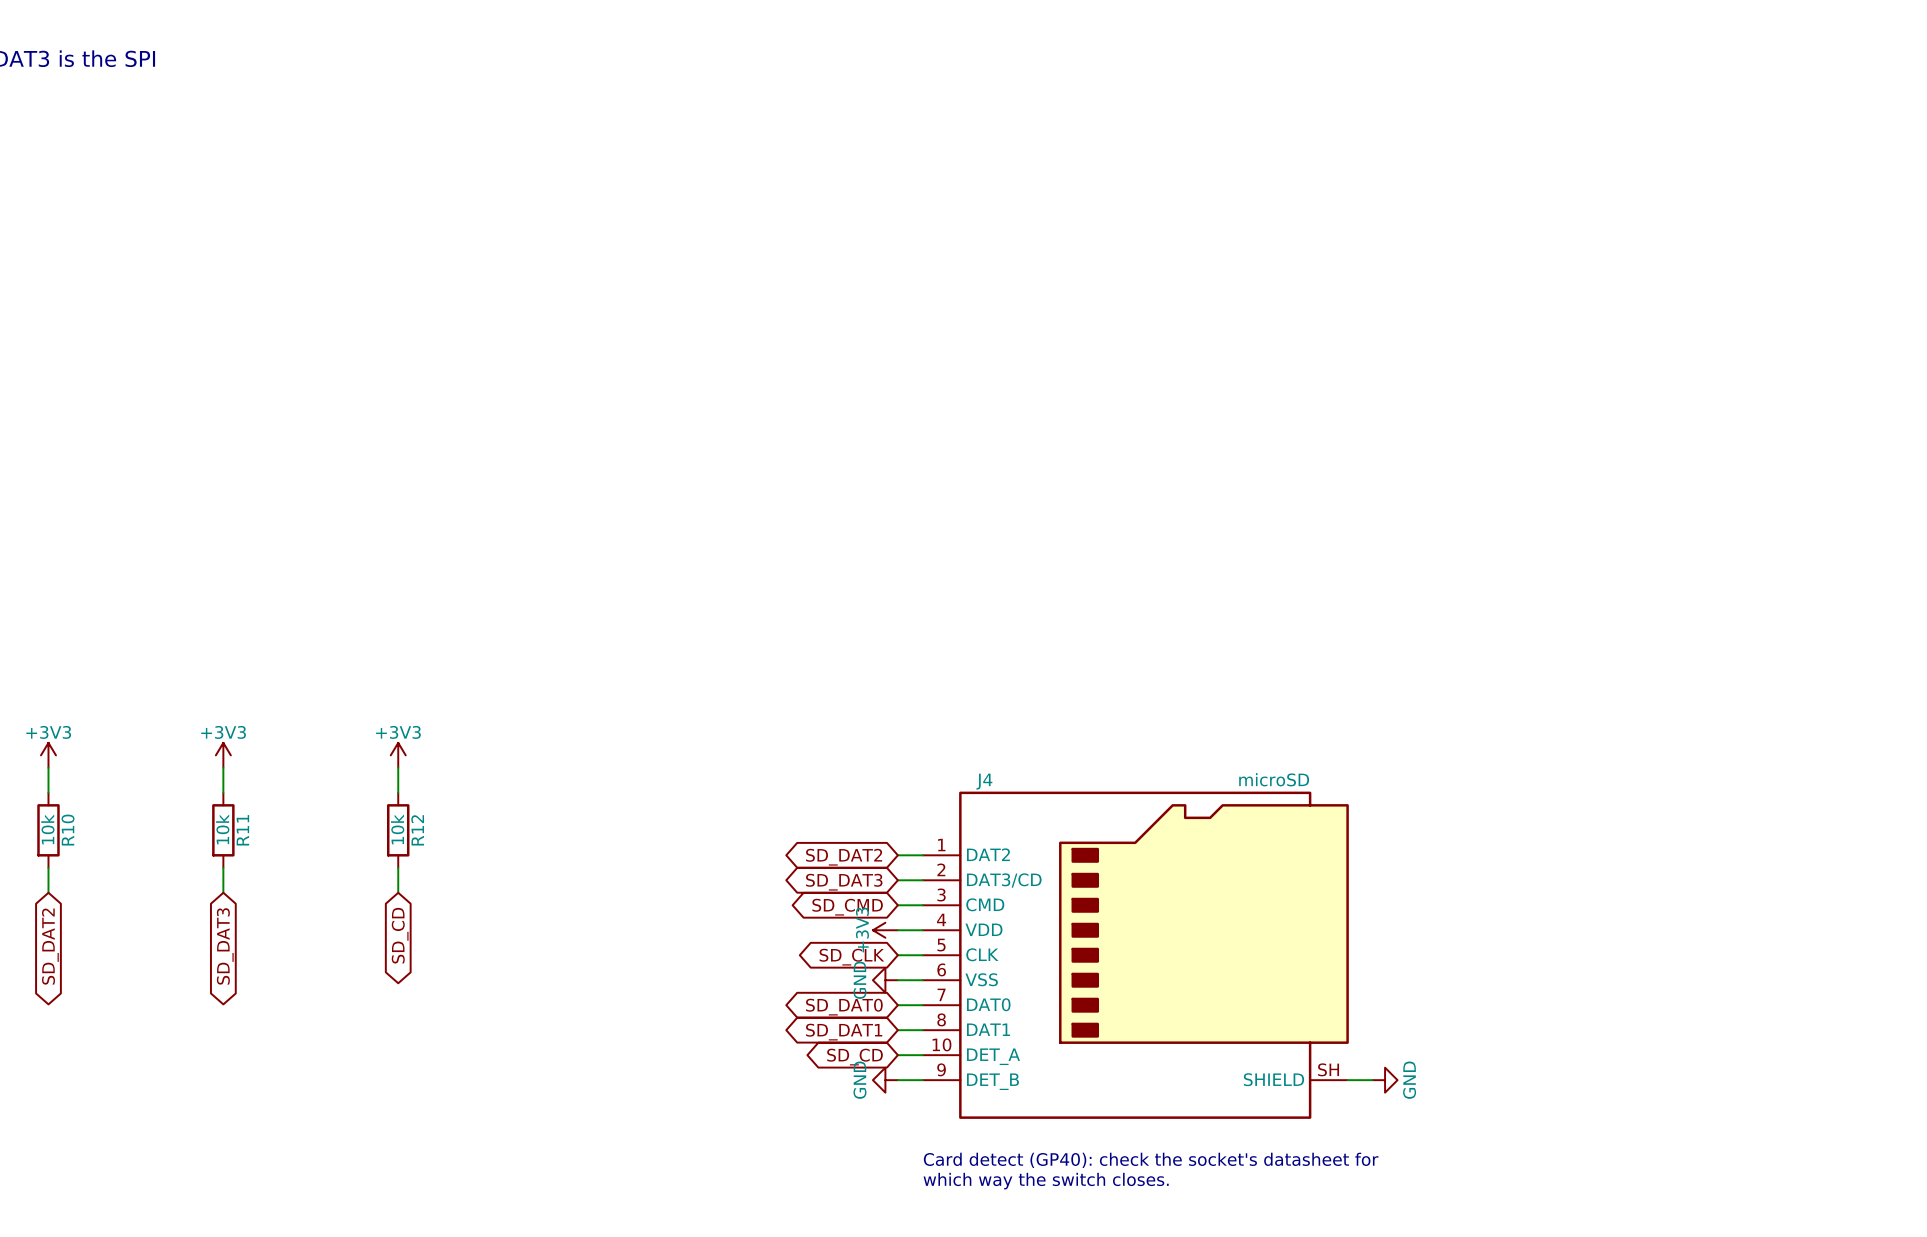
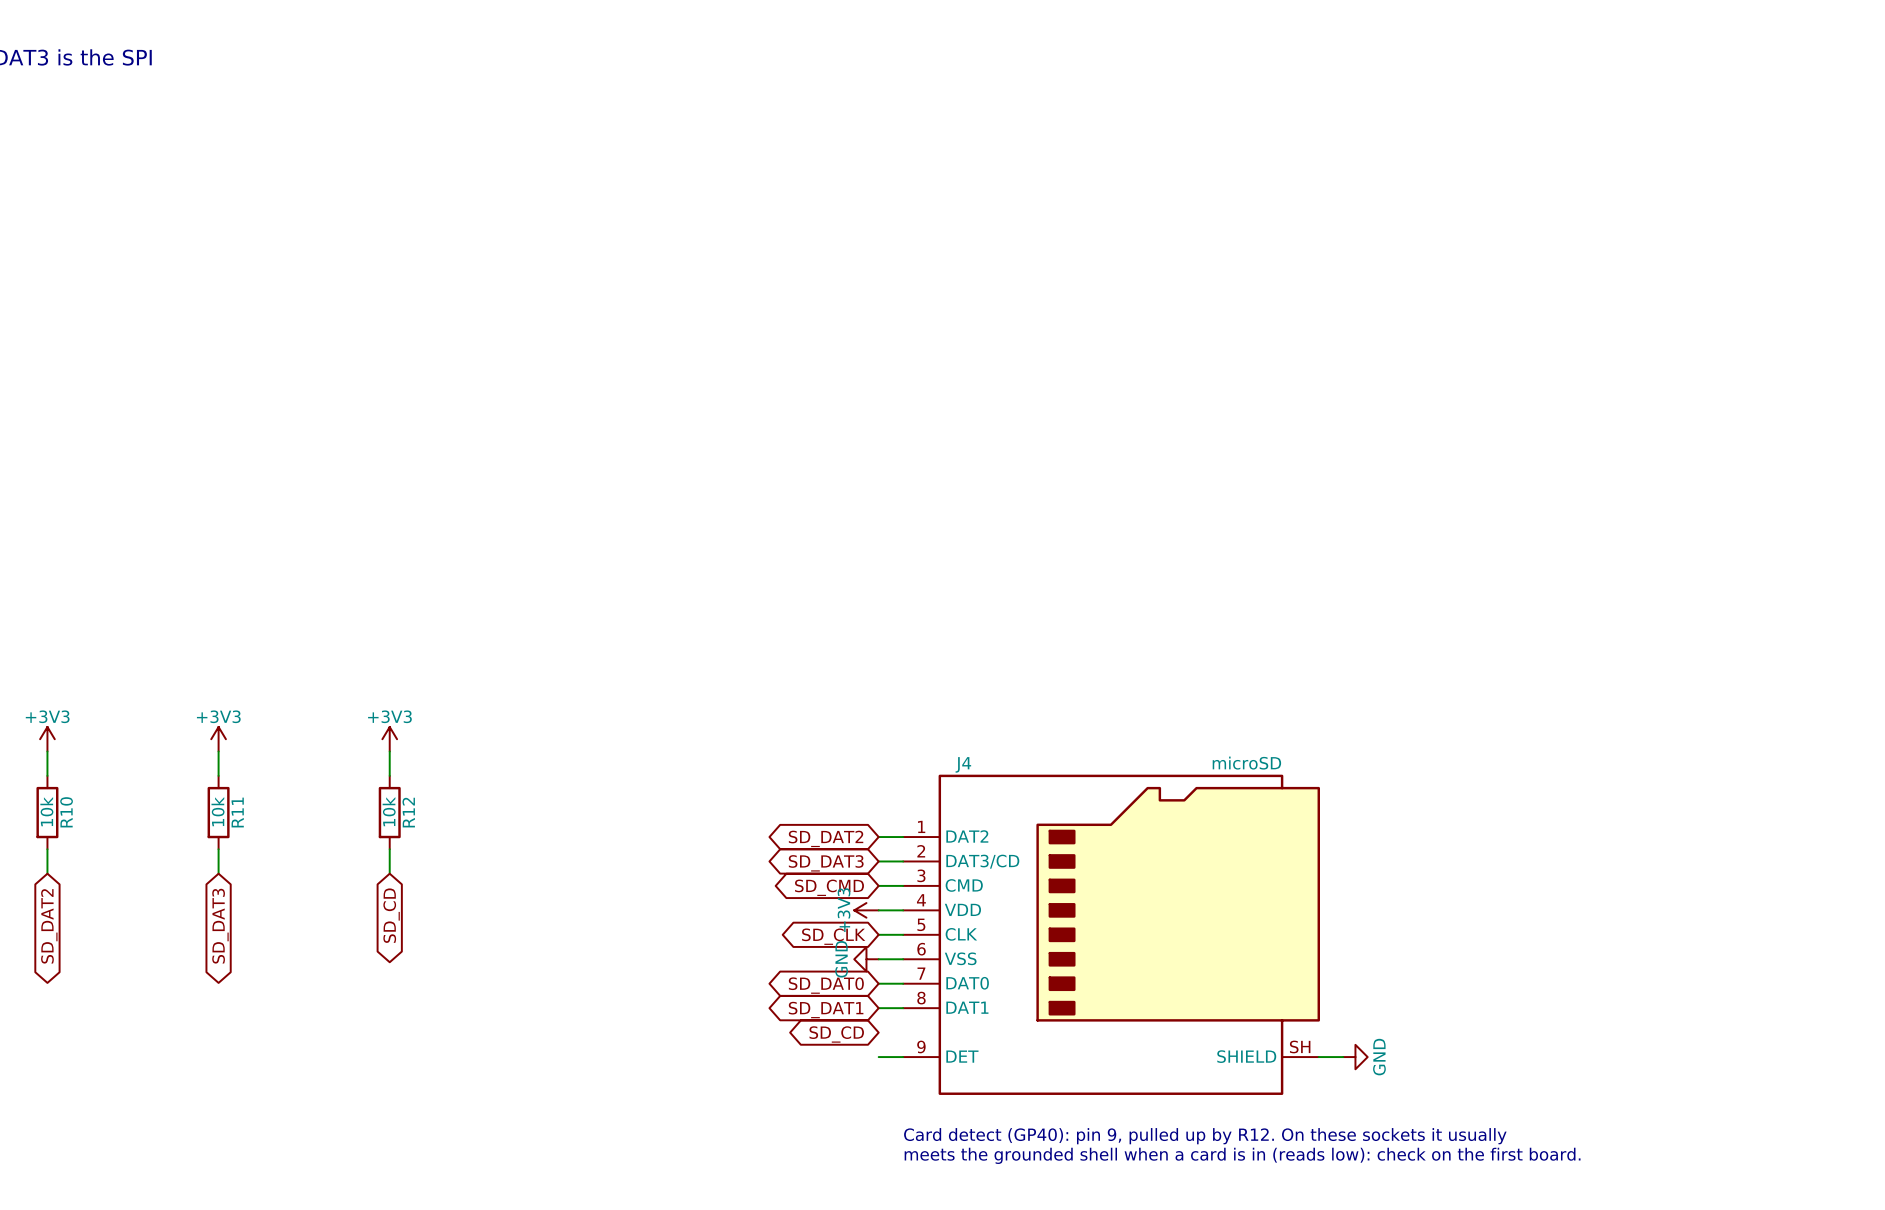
J4 symbol: [922, 791, 1349, 1119] -> [903, 774, 1320, 1095]
wire: (897, 1055) (922, 1055) -> none
power symbol: GND (885, 1080) -> none
text: Card detect (GP40): check the socket's datasheet for (1151, 1160) -> Card detect (GP40): pin 9, pulled up by R12. On these sockets it usually (1205, 1136)
text: which way the switch closes. (1046, 1181) -> meets the grounded shell when a card is in (reads low): check on the first board. (1242, 1155)

